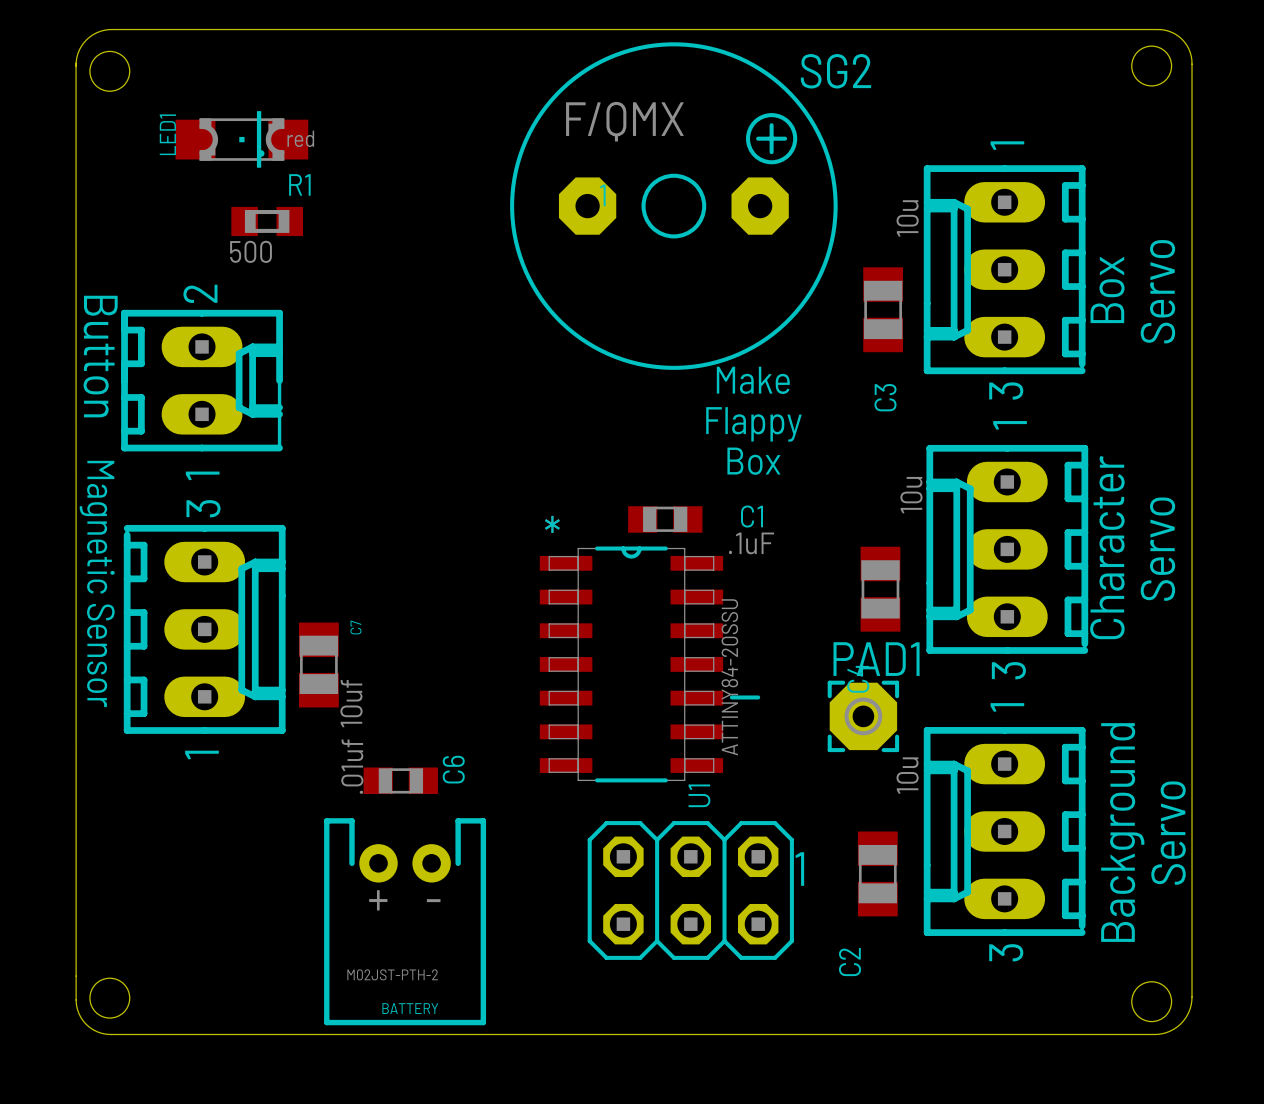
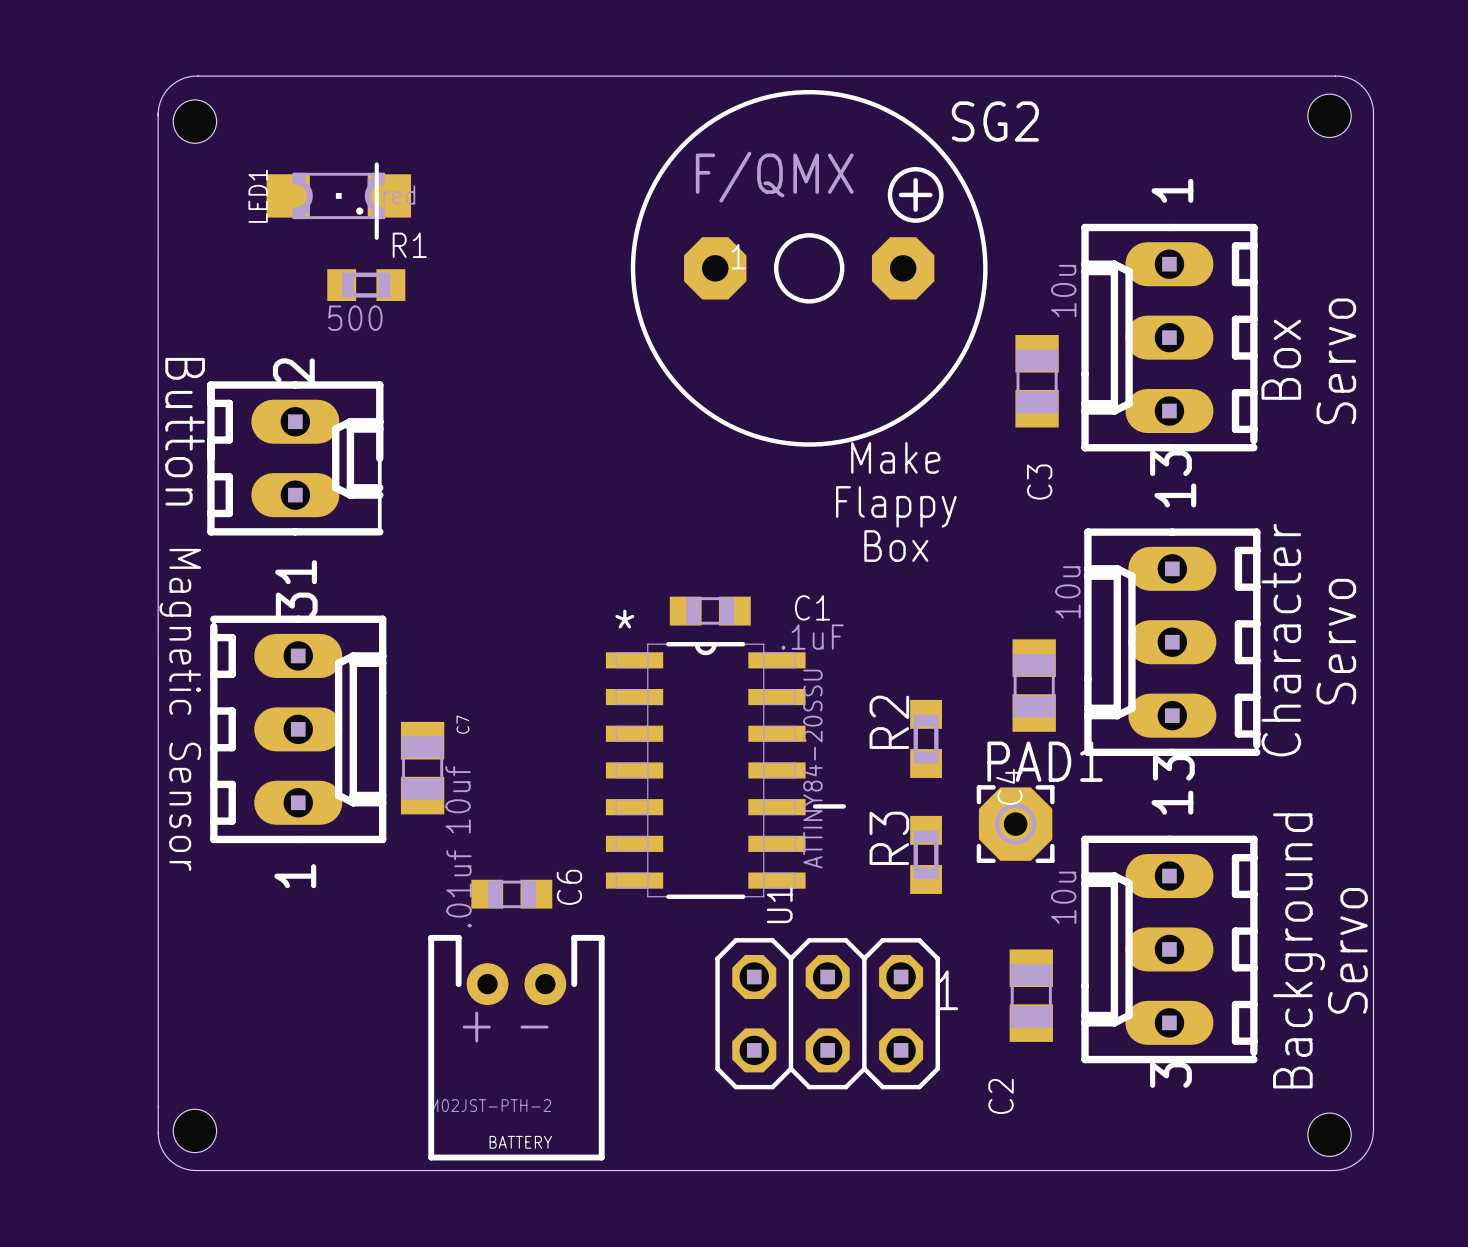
C1 position: (665, 519) -> (710, 611)
R2: none -> (926, 738)
U1 position: (649, 664) -> (725, 770)
R3: none -> (926, 854)

